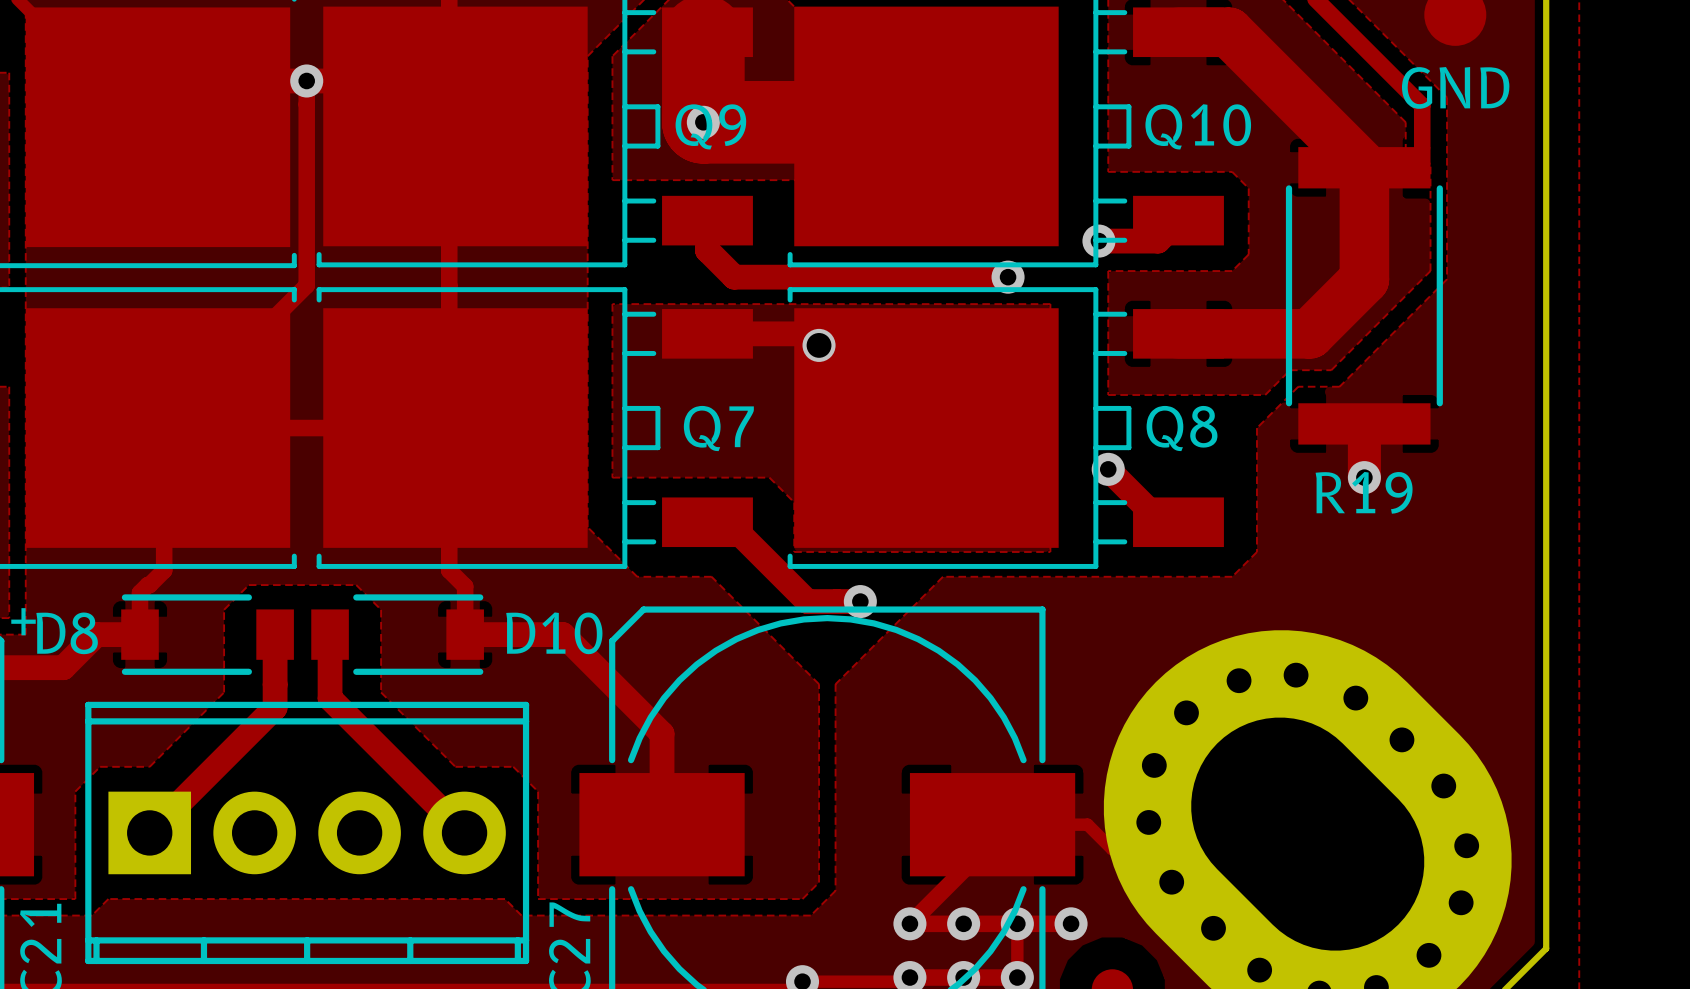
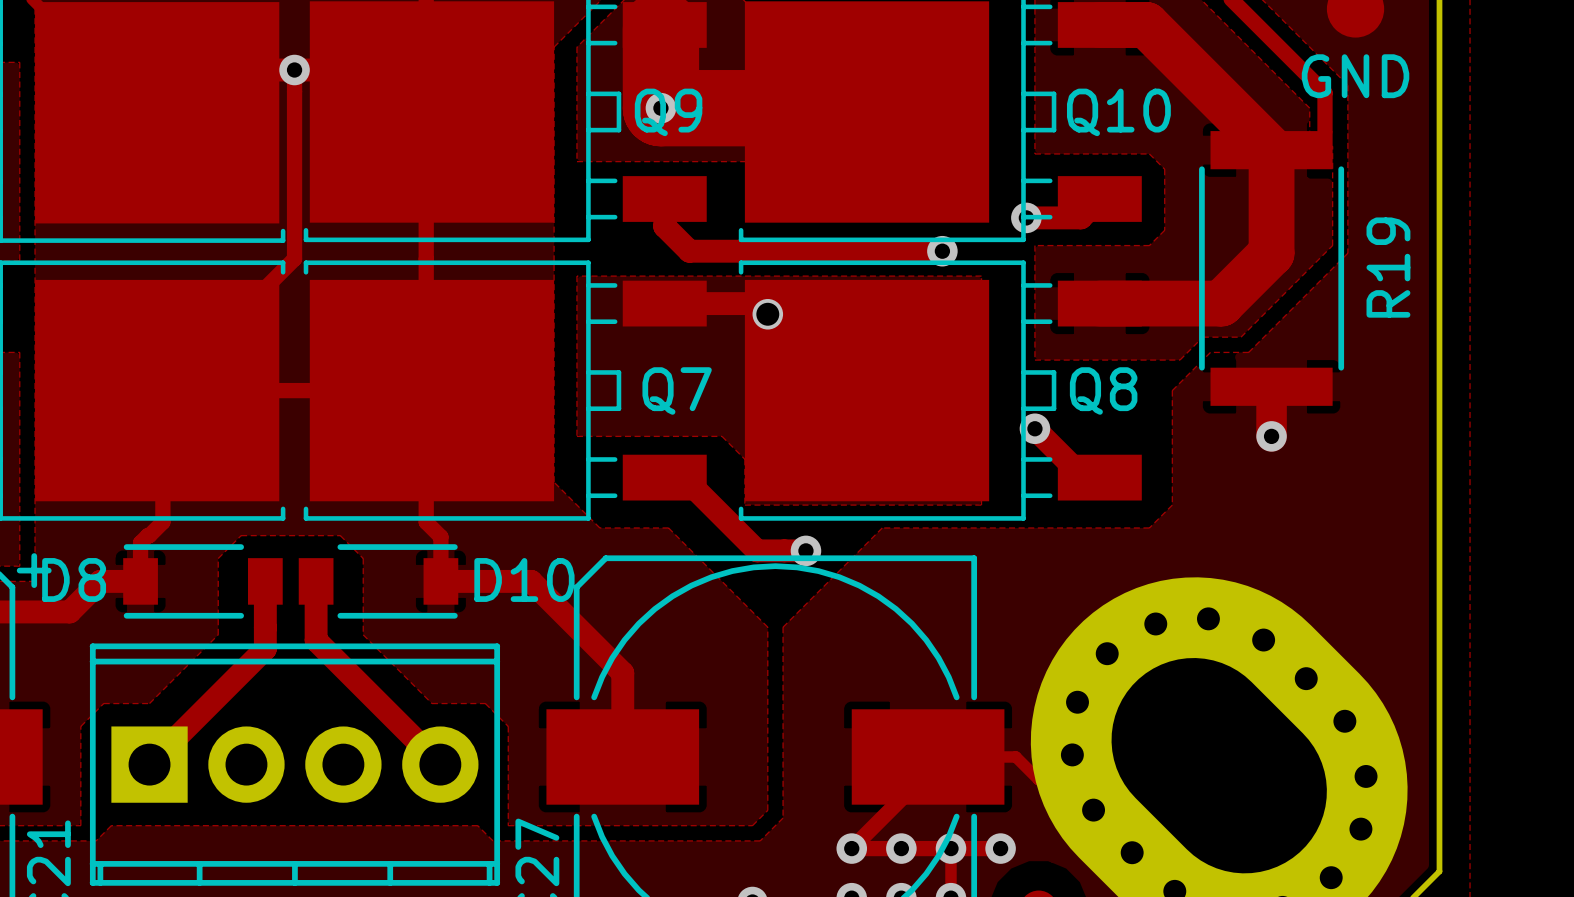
R19 name rotation: 0° (1364, 492) -> 90° counterclockwise (1388, 267)
R19 name position: R19 (1364, 492) -> R19 (1388, 267)

